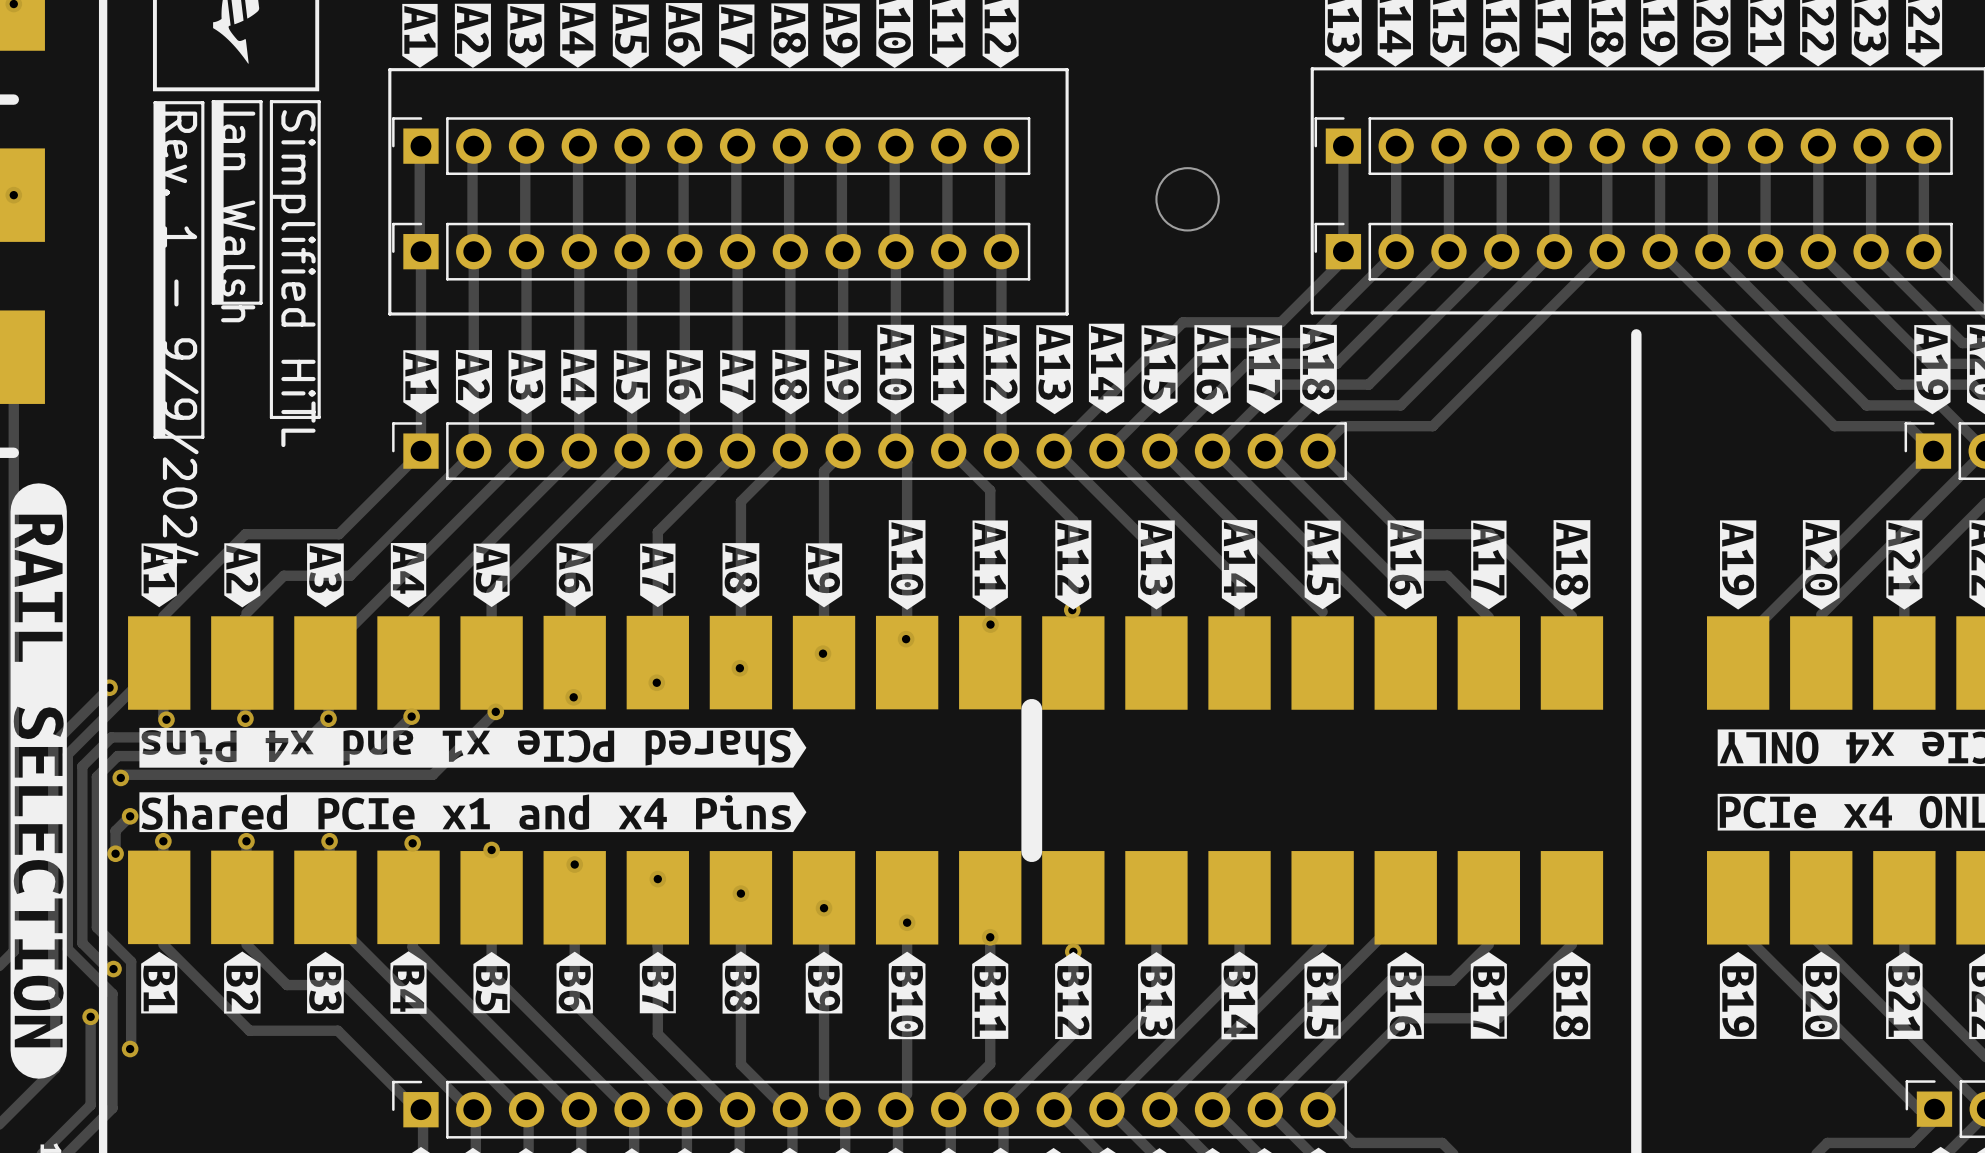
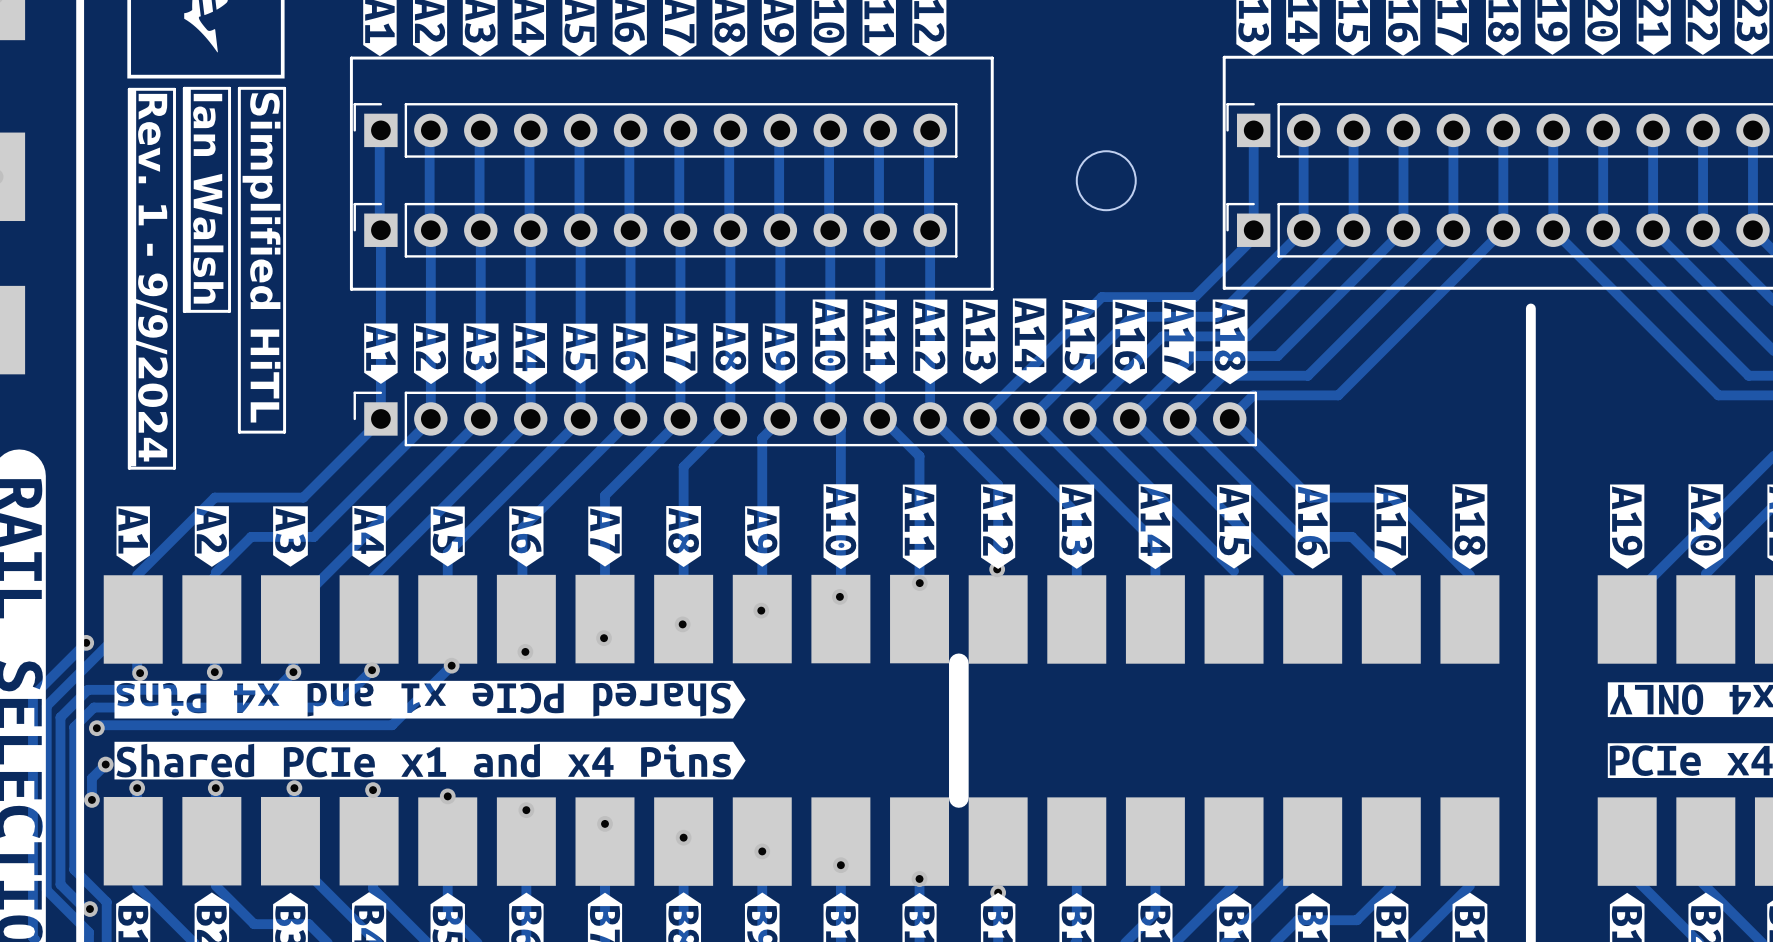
drawing shape: [213, 101, 224, 304] -> [184, 88, 191, 313]
drawing: [155, 102, 166, 437] -> none
drawing: none -> [129, 89, 137, 467]
line: (213, 303) (261, 303) -> (184, 279) (184, 311) (229, 311) (229, 279)
line: (271, 417) (319, 417) -> (239, 387) (239, 432) (284, 432) (284, 387)
line: (155, 437) (202, 437) -> (129, 405) (129, 468) (174, 468) (174, 405)

